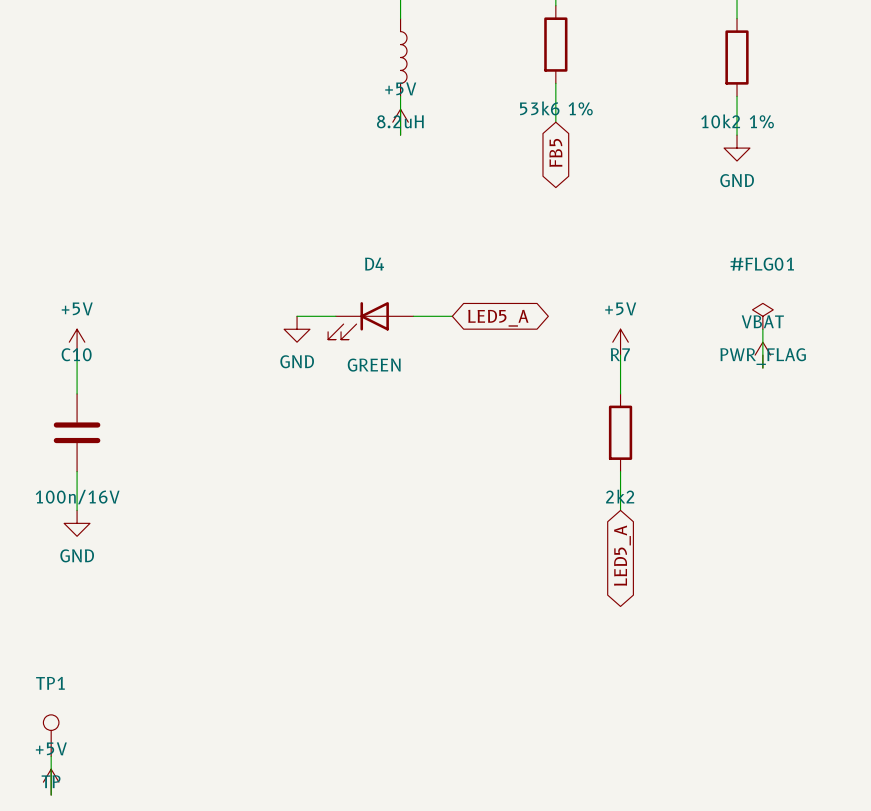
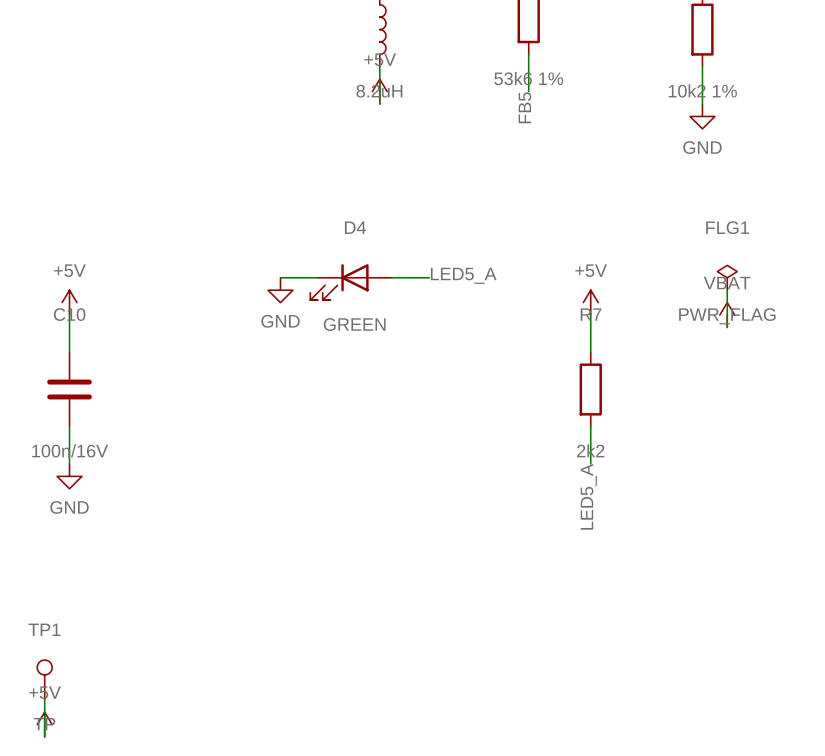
label: none -> FB5 (524, 107)
global label: FB5 (555, 152) -> none
#FLG01 name: #FLG01 (762, 264) -> FLG1 (727, 227)
label: none -> LED5_A (463, 275)
global label: LED5_A (498, 318) -> none
label: none -> LED5_A (588, 496)
global label: LED5_A (622, 555) -> none

